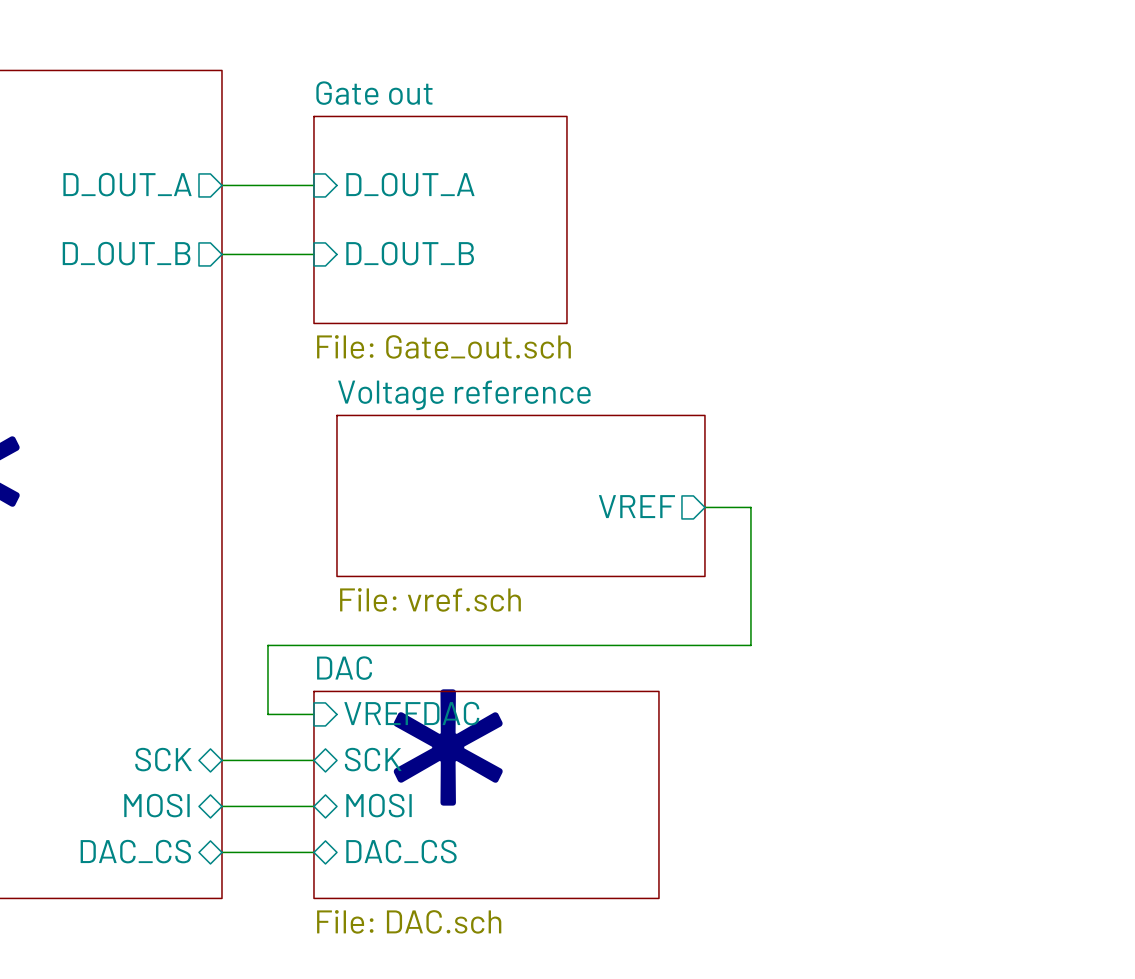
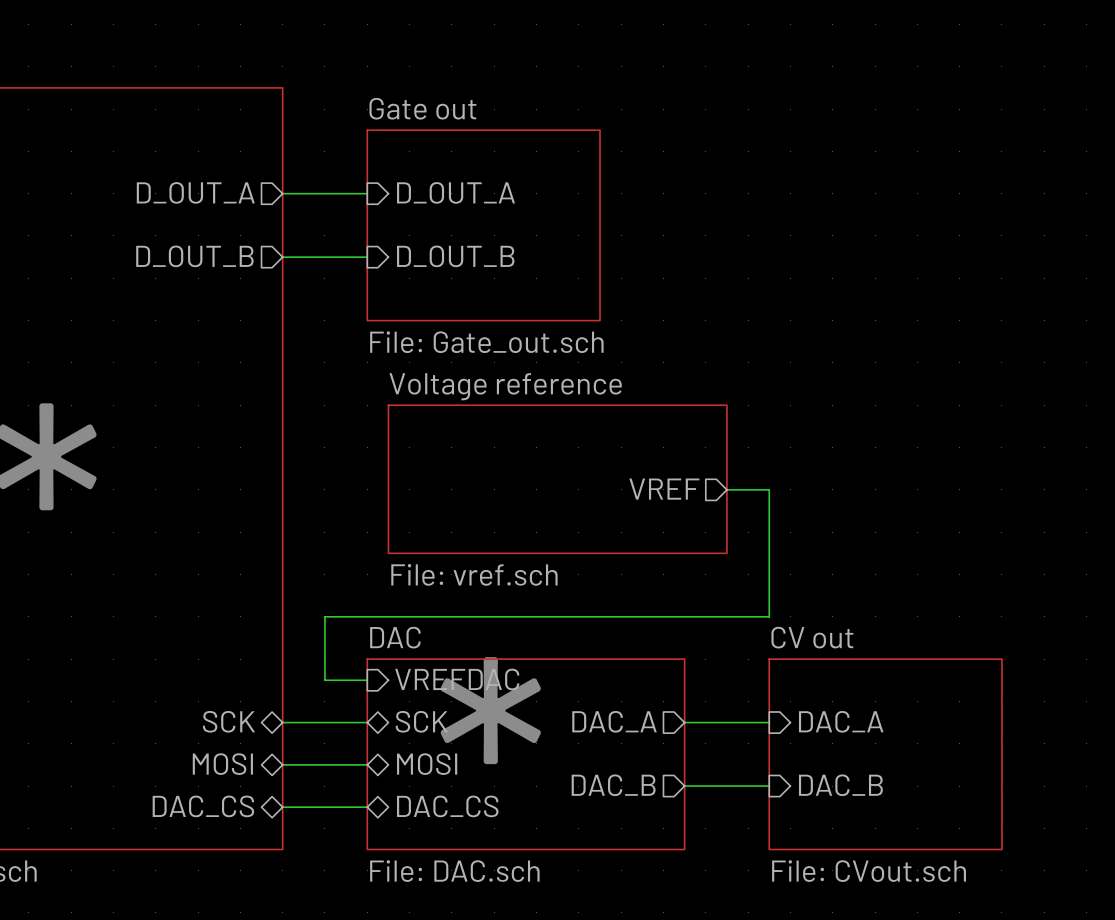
sheet pin: none -> DAC_A (614, 721)
sheet pin: none -> DAC_A (841, 721)
wire: none -> (684, 722) (769, 722)
sheet CV out: none -> File: CVout.sch (885, 754)
sheet pin: none -> DAC_B (613, 785)
sheet pin: none -> DAC_B (840, 785)
wire: none -> (684, 786) (769, 786)

